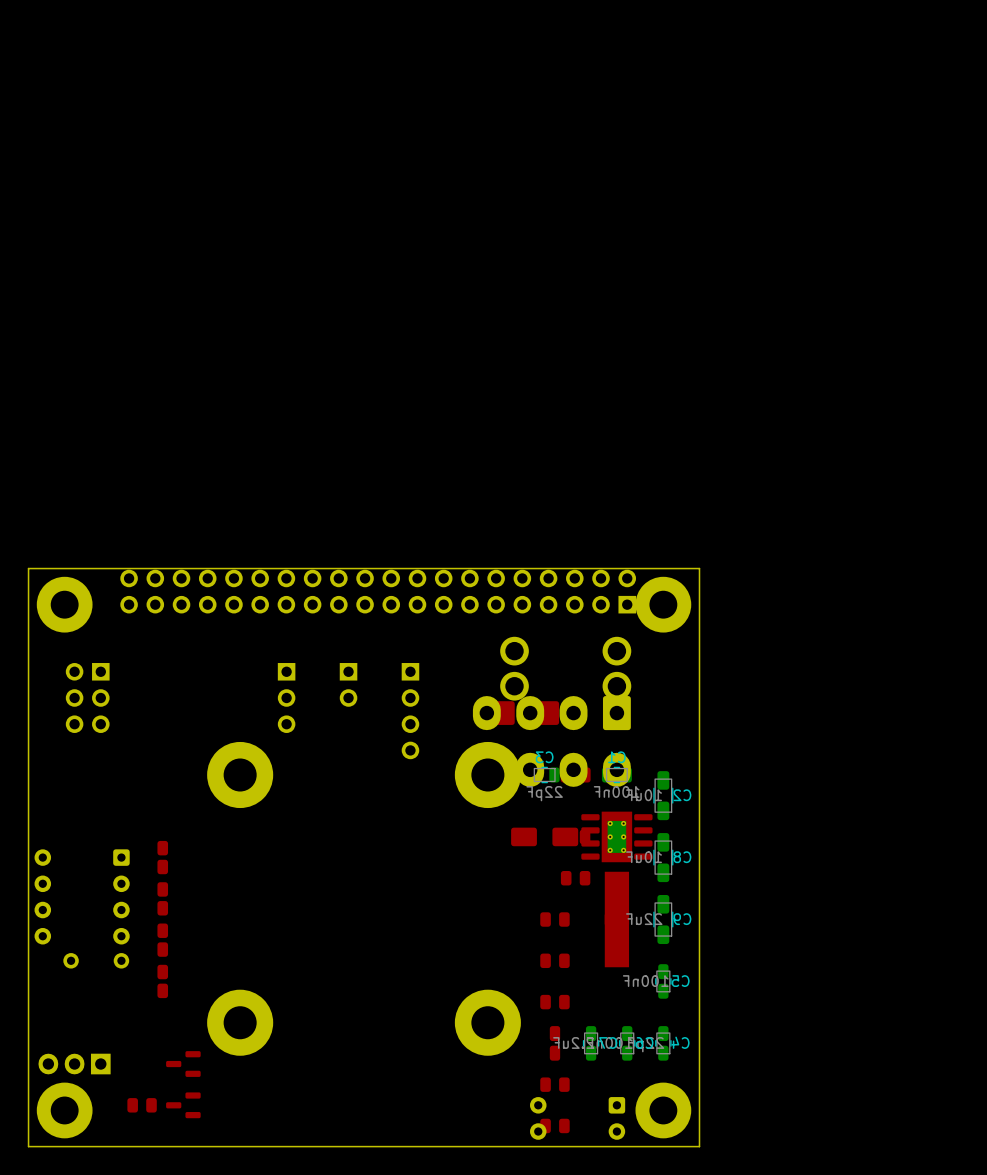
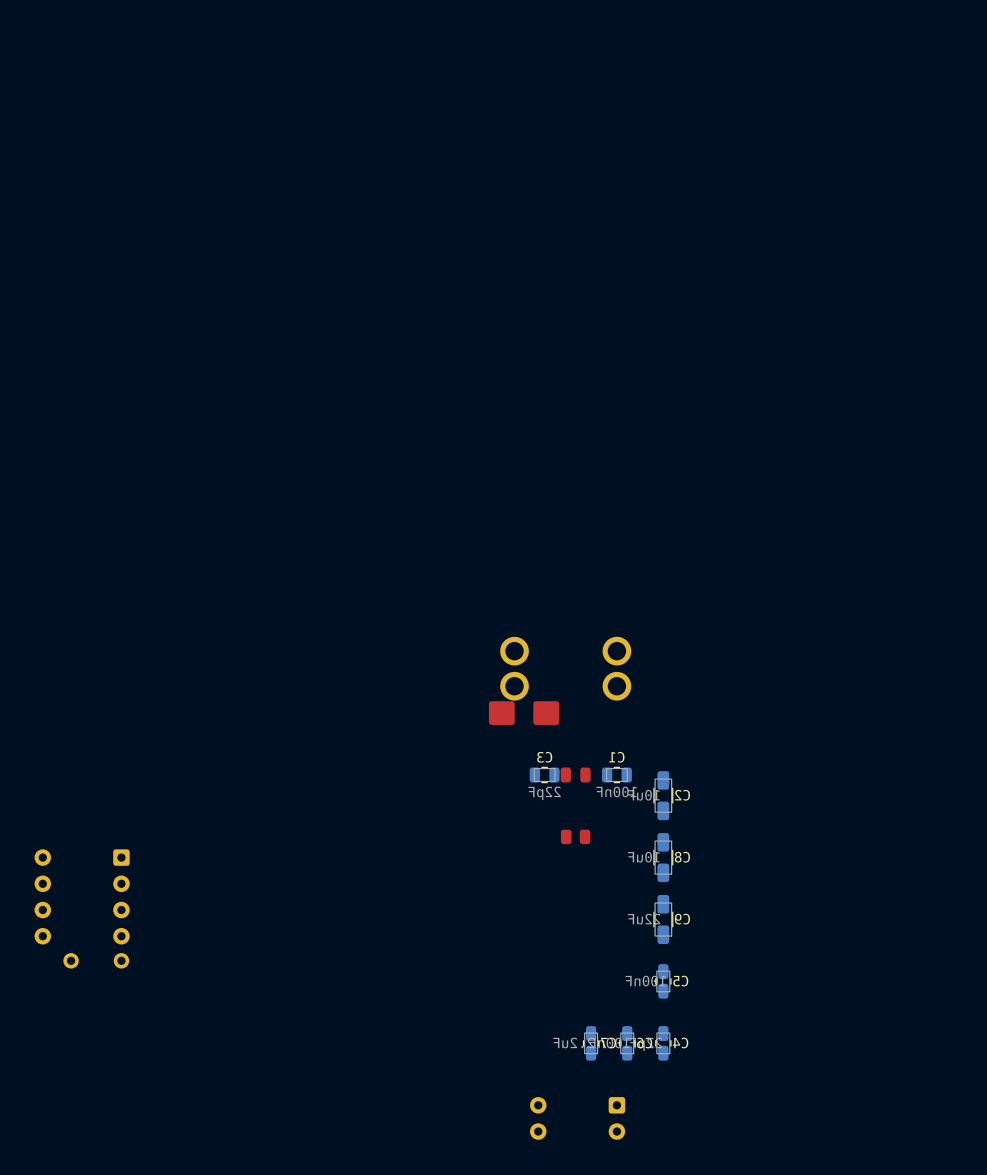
board edge: (699, 568) (699, 1146) (28, 1146) (28, 568) (699, 568) -> none
part: (378, 591) -> none
part: (64, 604) -> none
part: (663, 604) -> none
part: (348, 684) -> none
part: (87, 697) -> none
part: (286, 697) -> none
part: (410, 711) -> none
part: (551, 741) -> none
part: (240, 775) -> none
part: (487, 775) -> none
part: (544, 836) -> none
part: (616, 836) -> none
part: (162, 857) -> none
part: (575, 878) -> none
part: (162, 898) -> none
part: (554, 919) -> none
part: (616, 919) -> none
part: (162, 940) -> none
part: (554, 960) -> none
part: (162, 981) -> none
part: (554, 1002) -> none
part: (240, 1022) -> none
part: (487, 1022) -> none
part: (554, 1043) -> none
part: (74, 1064) -> none
part: (183, 1064) -> none
part: (554, 1084) -> none
part: (142, 1105) -> none
part: (183, 1105) -> none
part: (64, 1110) -> none
part: (663, 1110) -> none
part: (554, 1125) -> none

